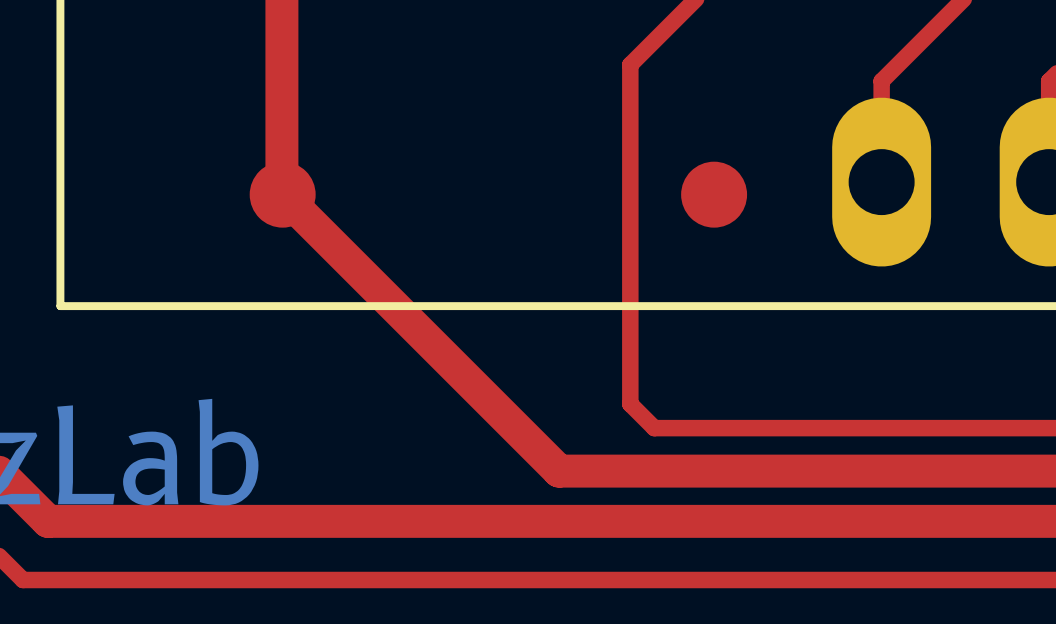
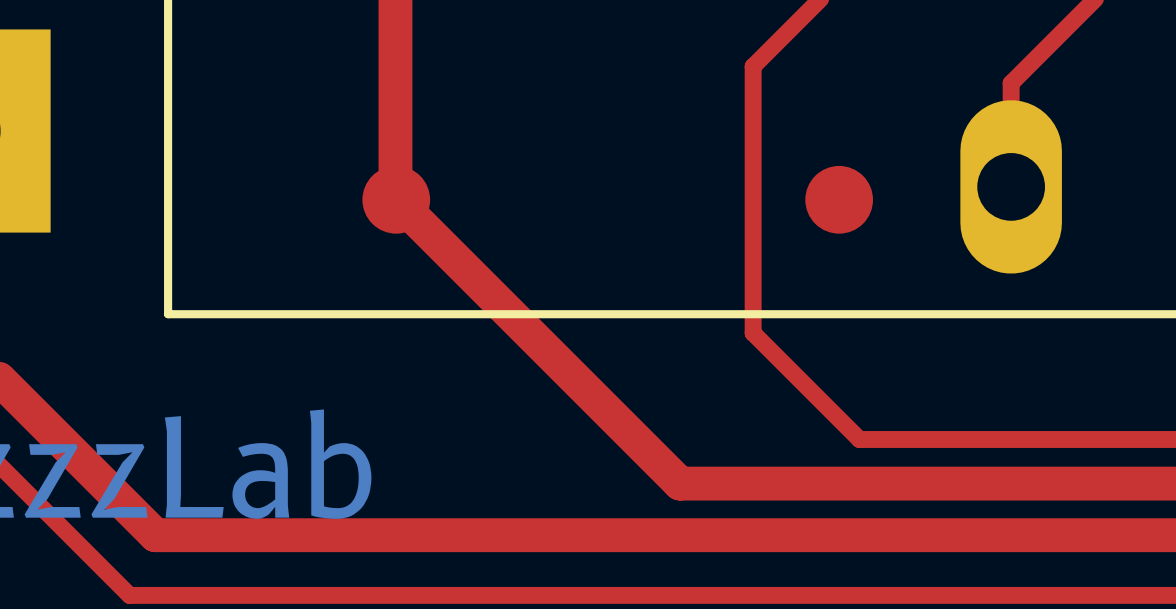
top track: (630, 324) (630, 404) (654, 428) (733, 428) -> (753, 333) (859, 439)

